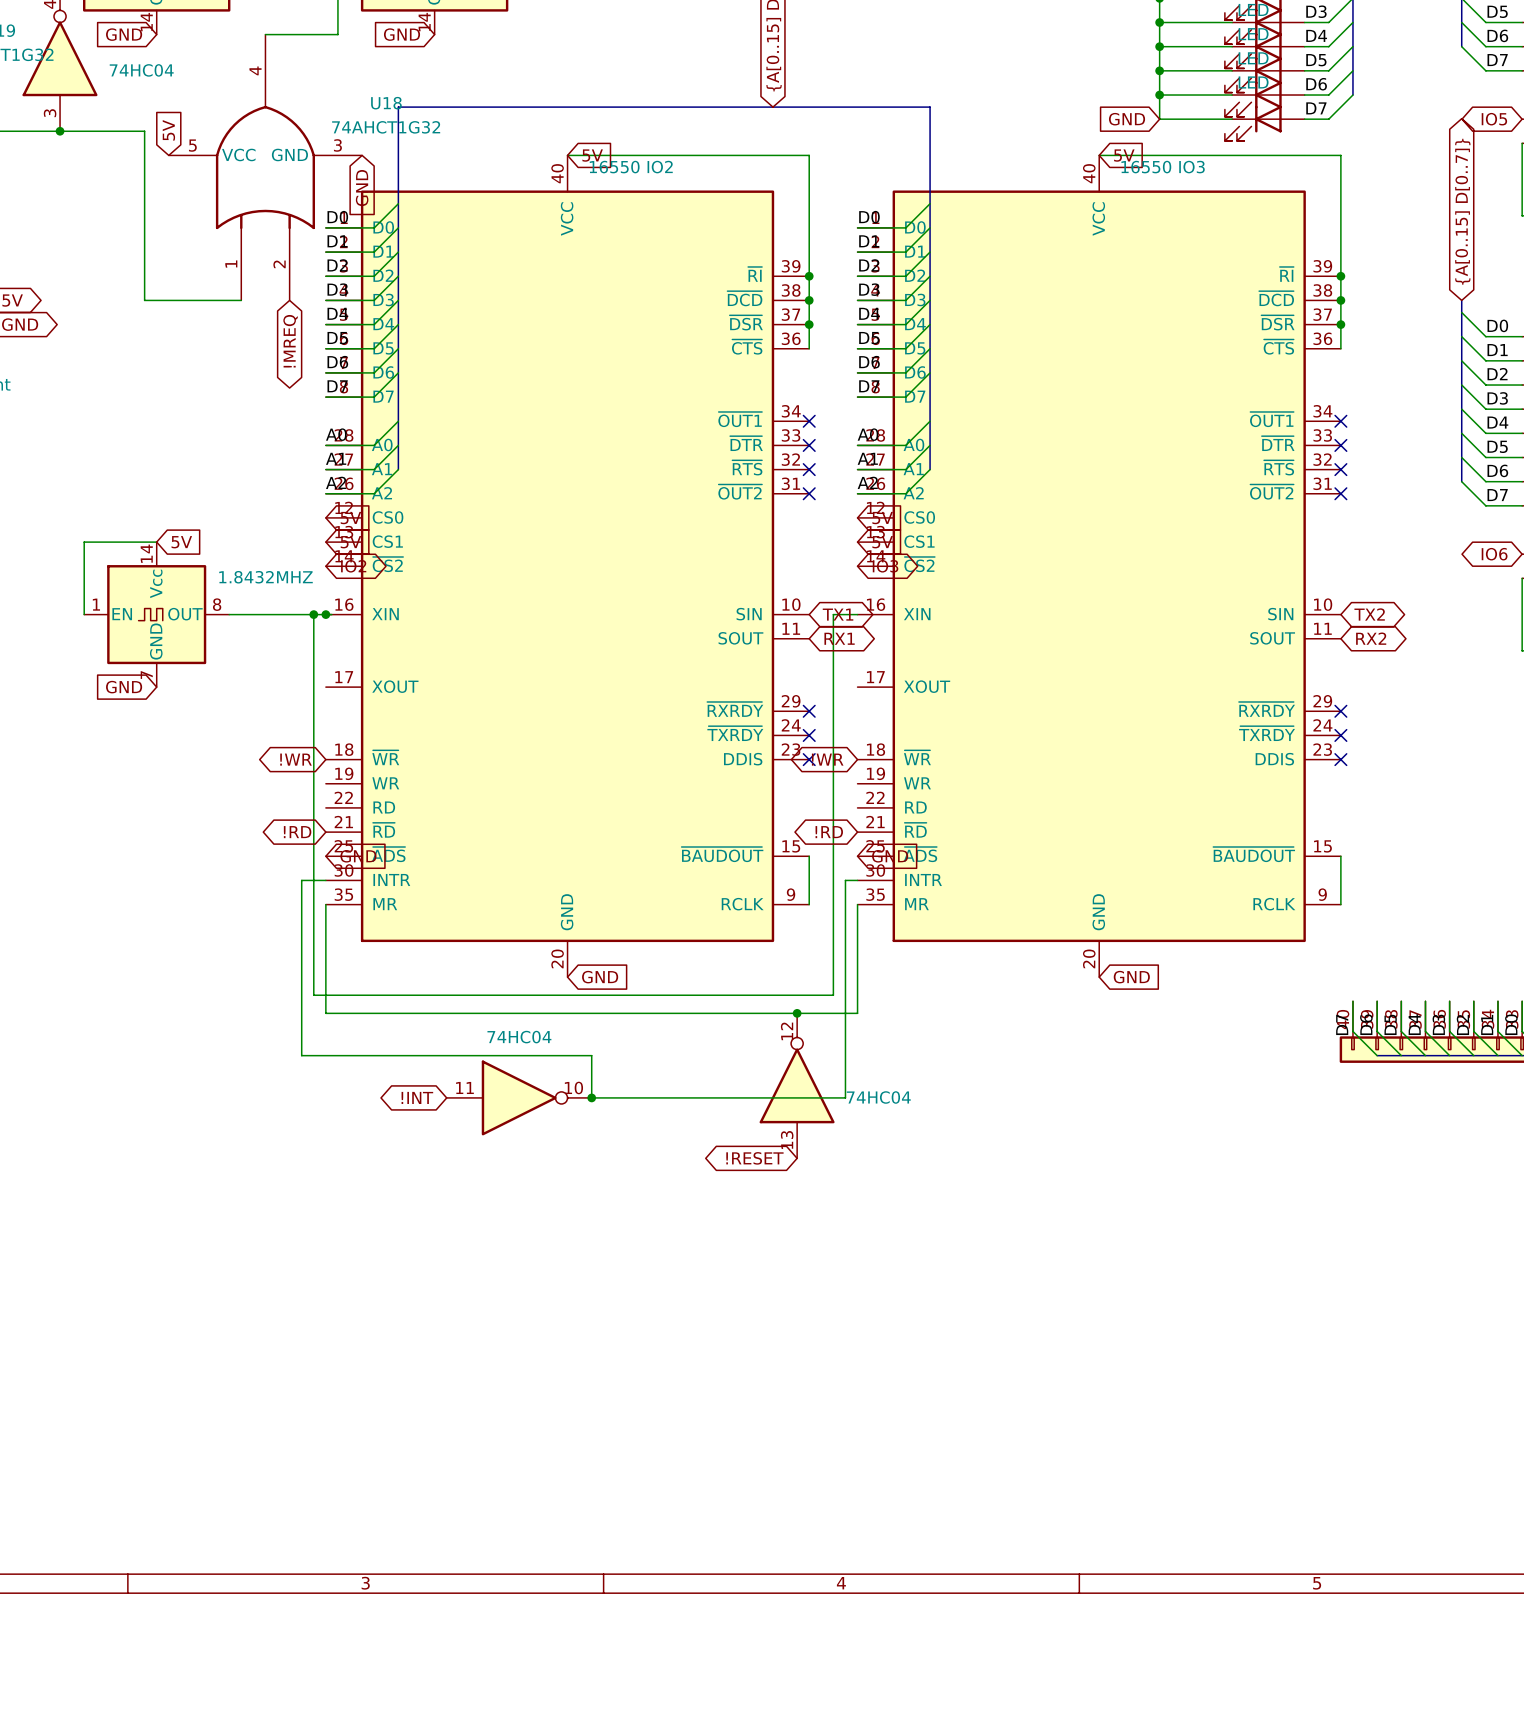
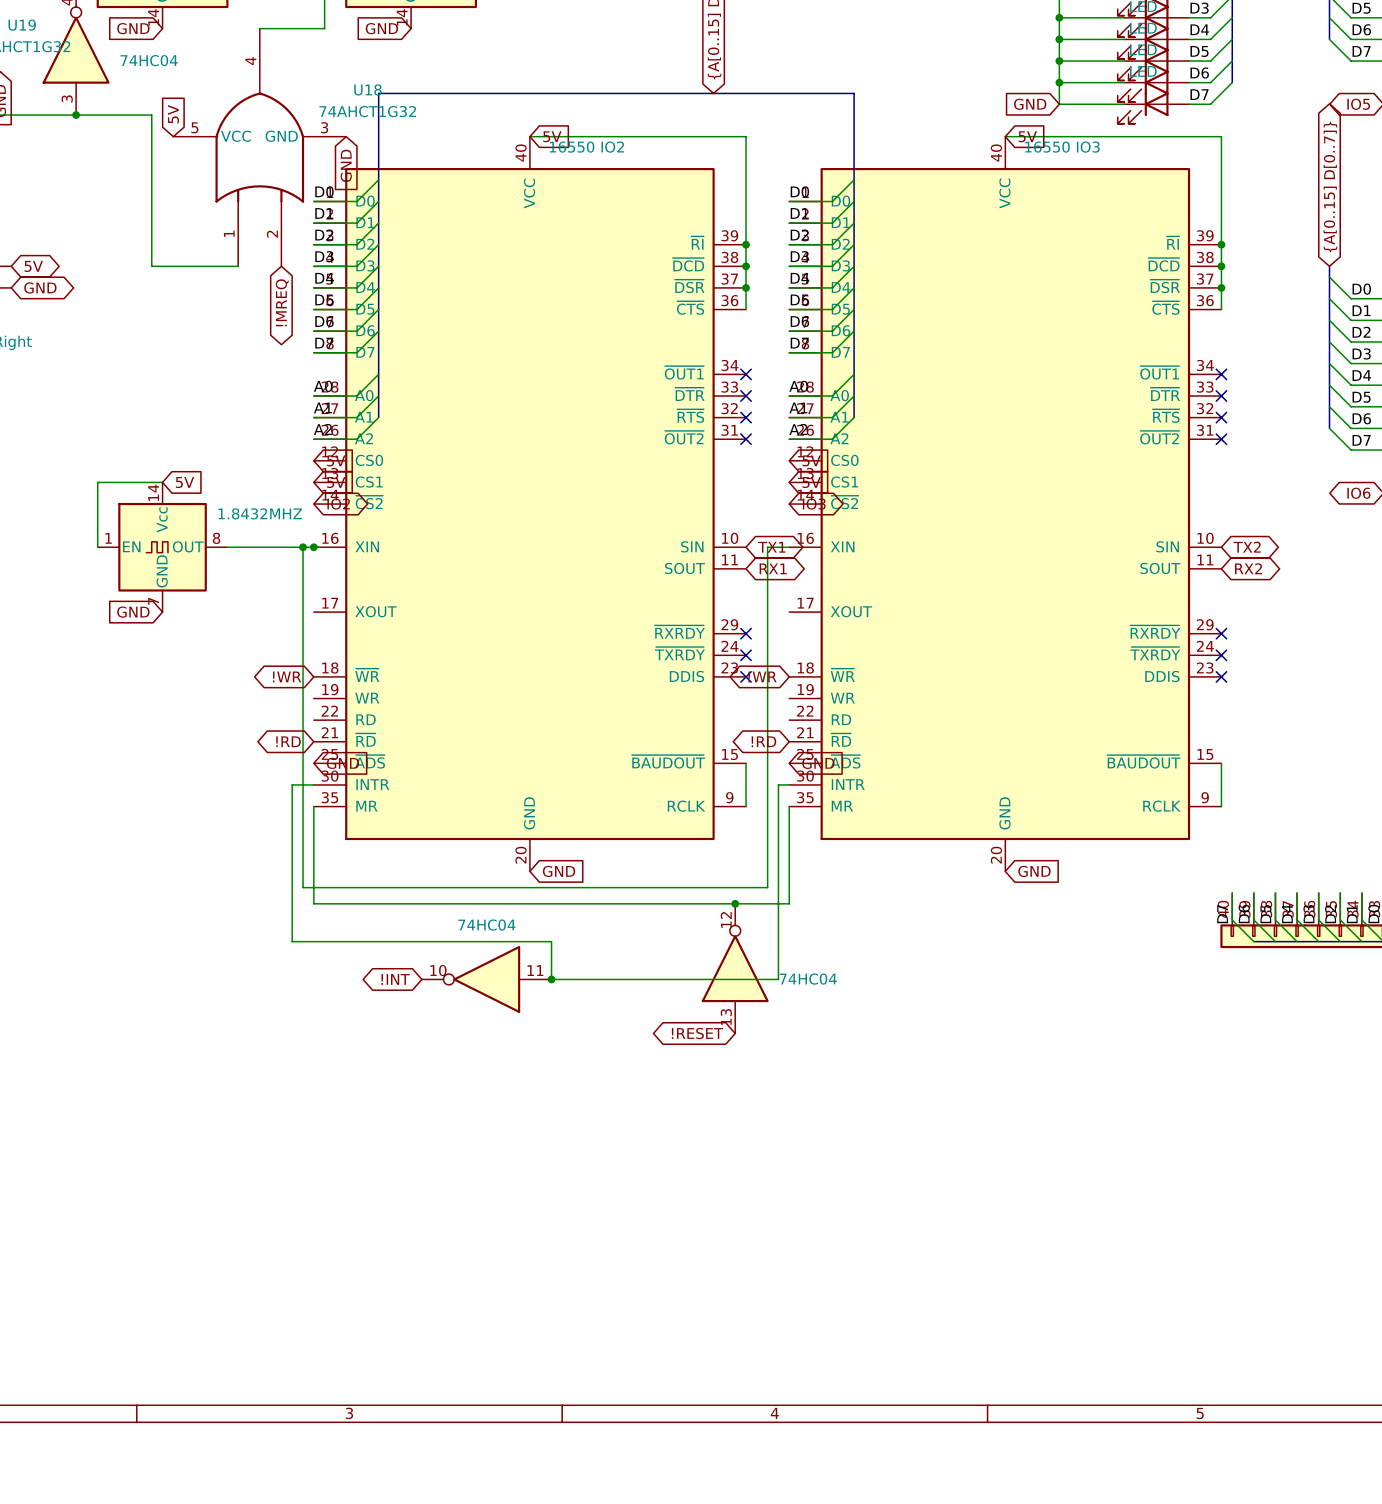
part rotation: 0° (519, 1097) -> 180° (486, 979)

